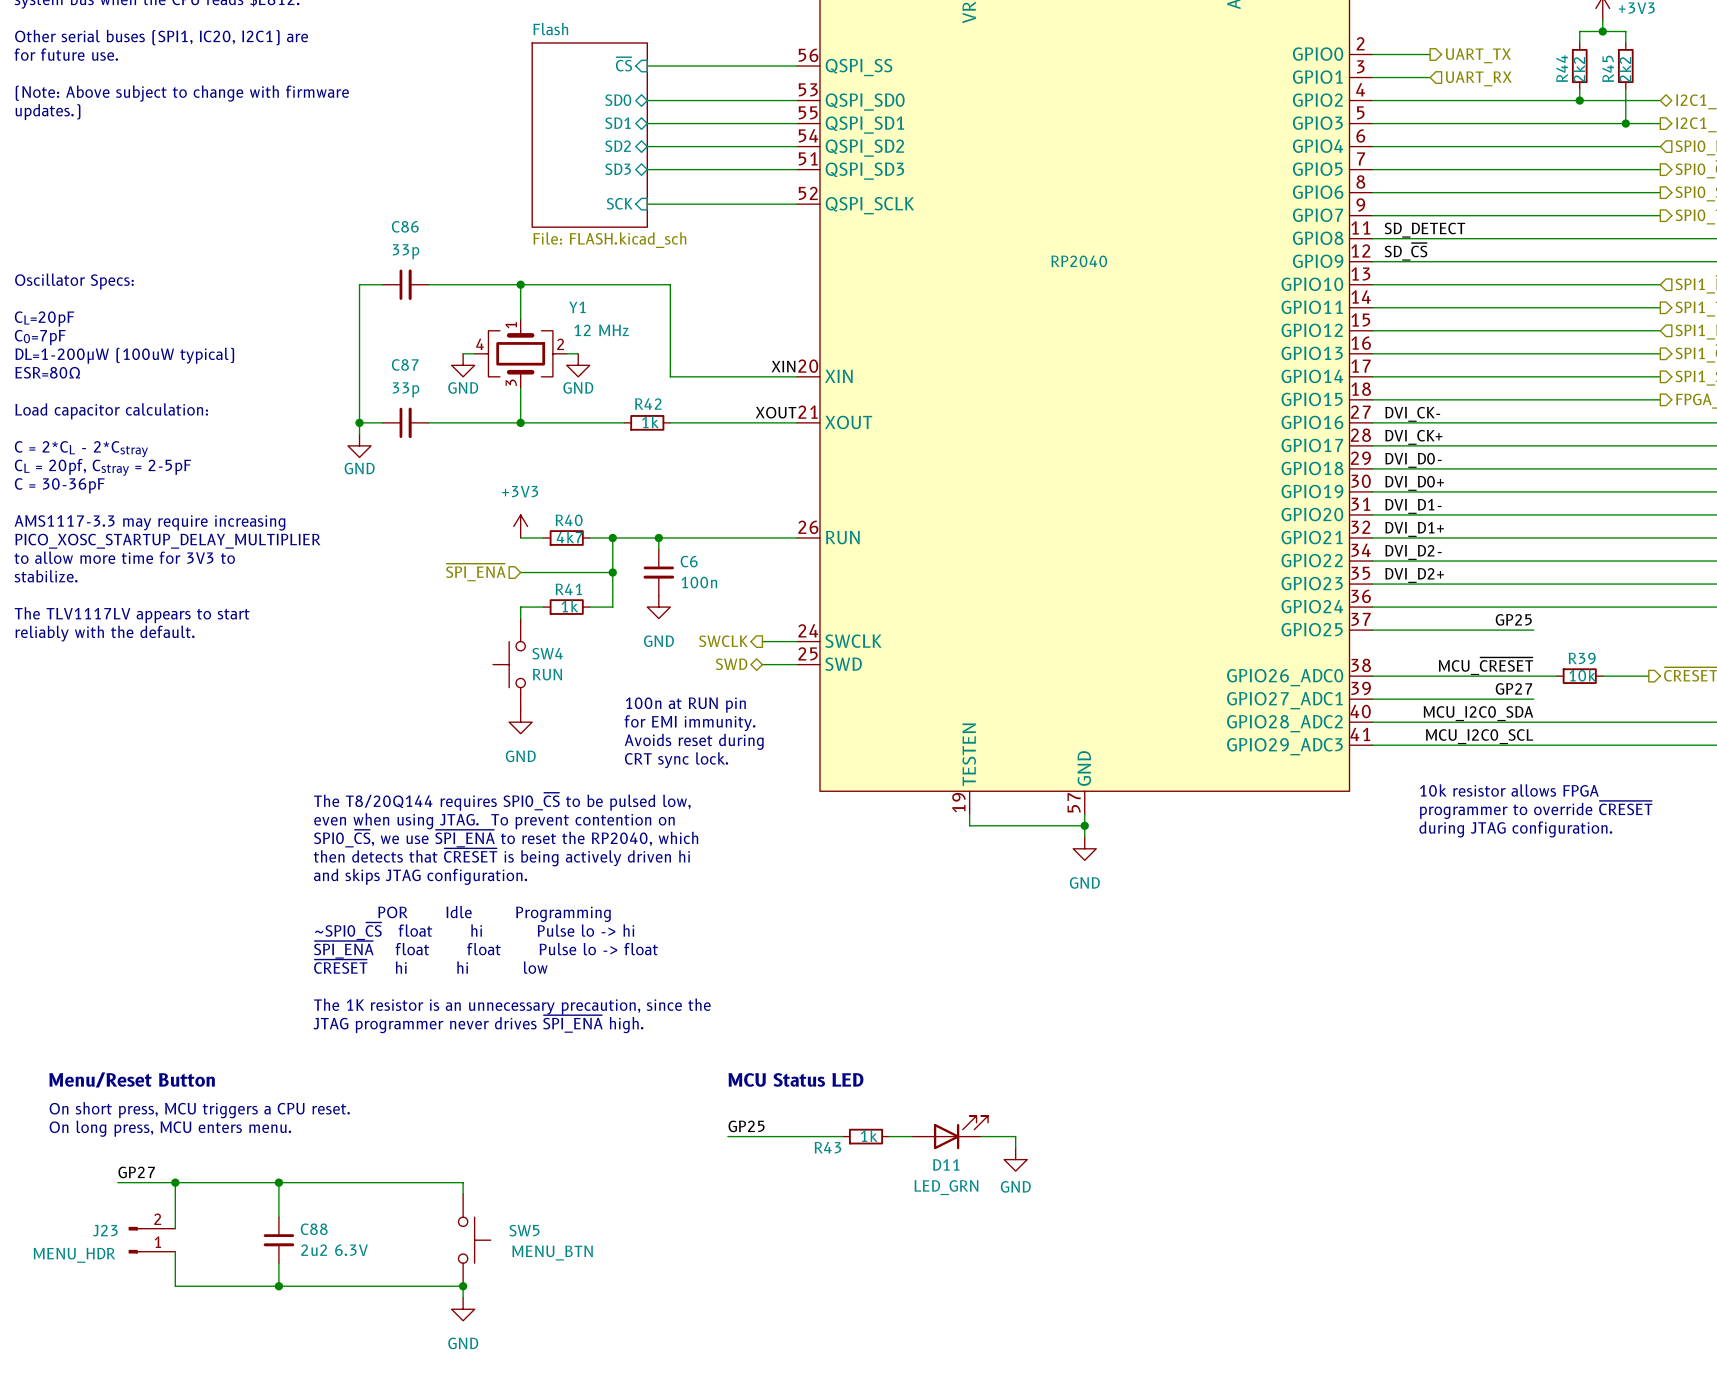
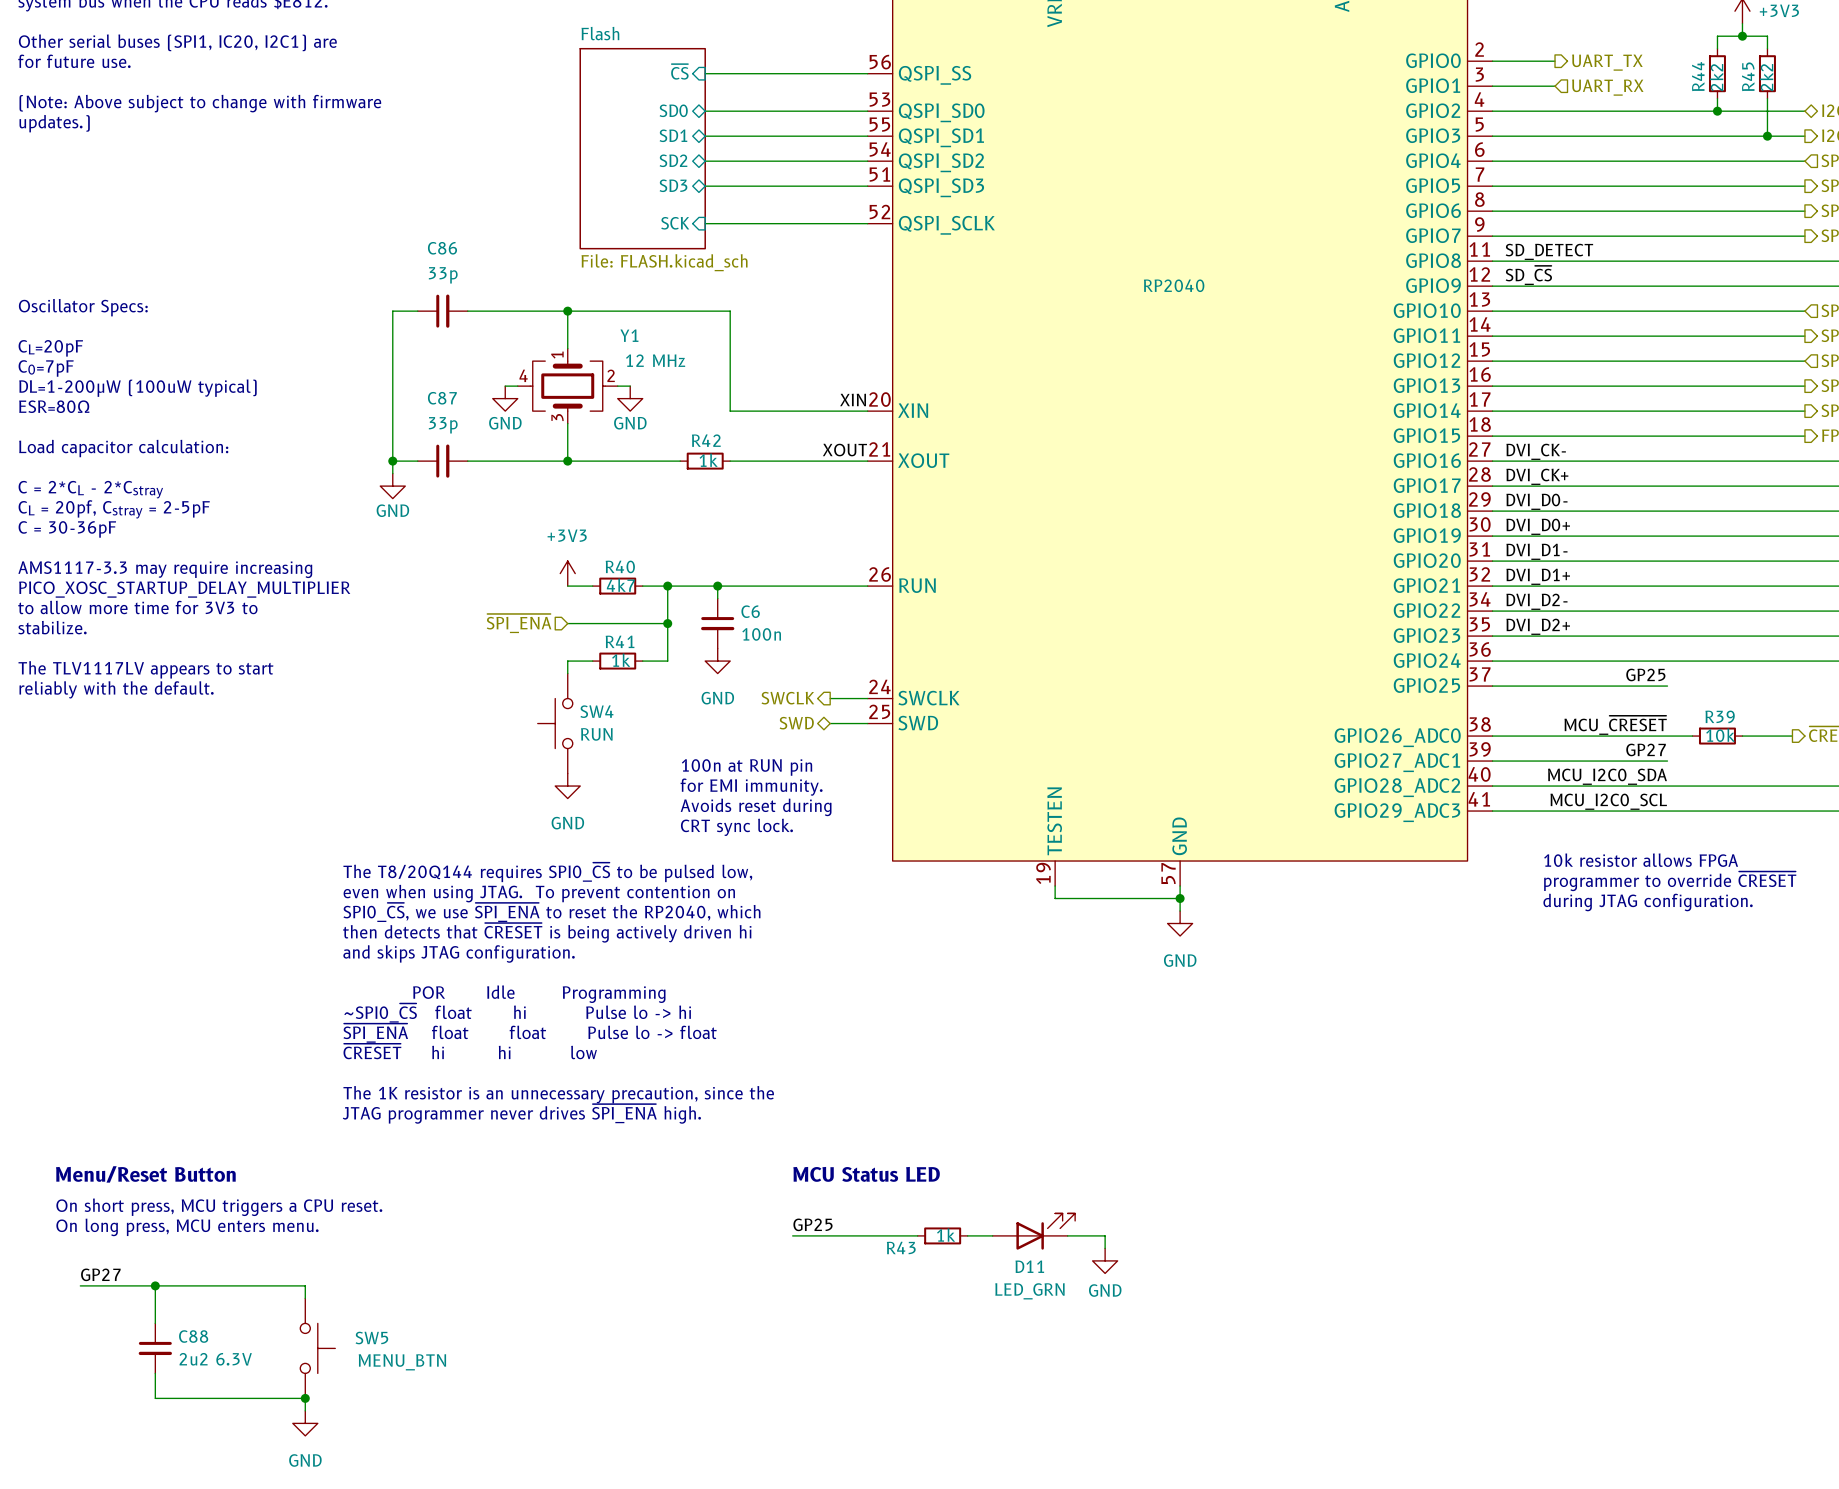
label position: GP27 (136, 1172) -> GP27 (100, 1274)
wire: none -> (80, 1285) (130, 1285)
wire: none -> (155, 1285) (155, 1323)
wire: (175, 1182) (175, 1228) -> none
junction position: (175, 1182) -> (155, 1285)
wire: (278, 1182) (463, 1182) (463, 1194) -> none
junction: (278, 1182) -> none
J23: MENU_HDR (151, 1240) -> none
C88 position: (278, 1240) -> (155, 1348)
SW5 position: (474, 1240) -> (317, 1348)
wire: (175, 1251) (175, 1286) -> (155, 1373) (155, 1398) (192, 1398)
wire: (278, 1263) (278, 1286) (463, 1286) (463, 1297) -> none
wire: none -> (305, 1398) (305, 1410)
junction: (463, 1286) -> none
power symbol position: GND (463, 1309) -> GND (305, 1423)

